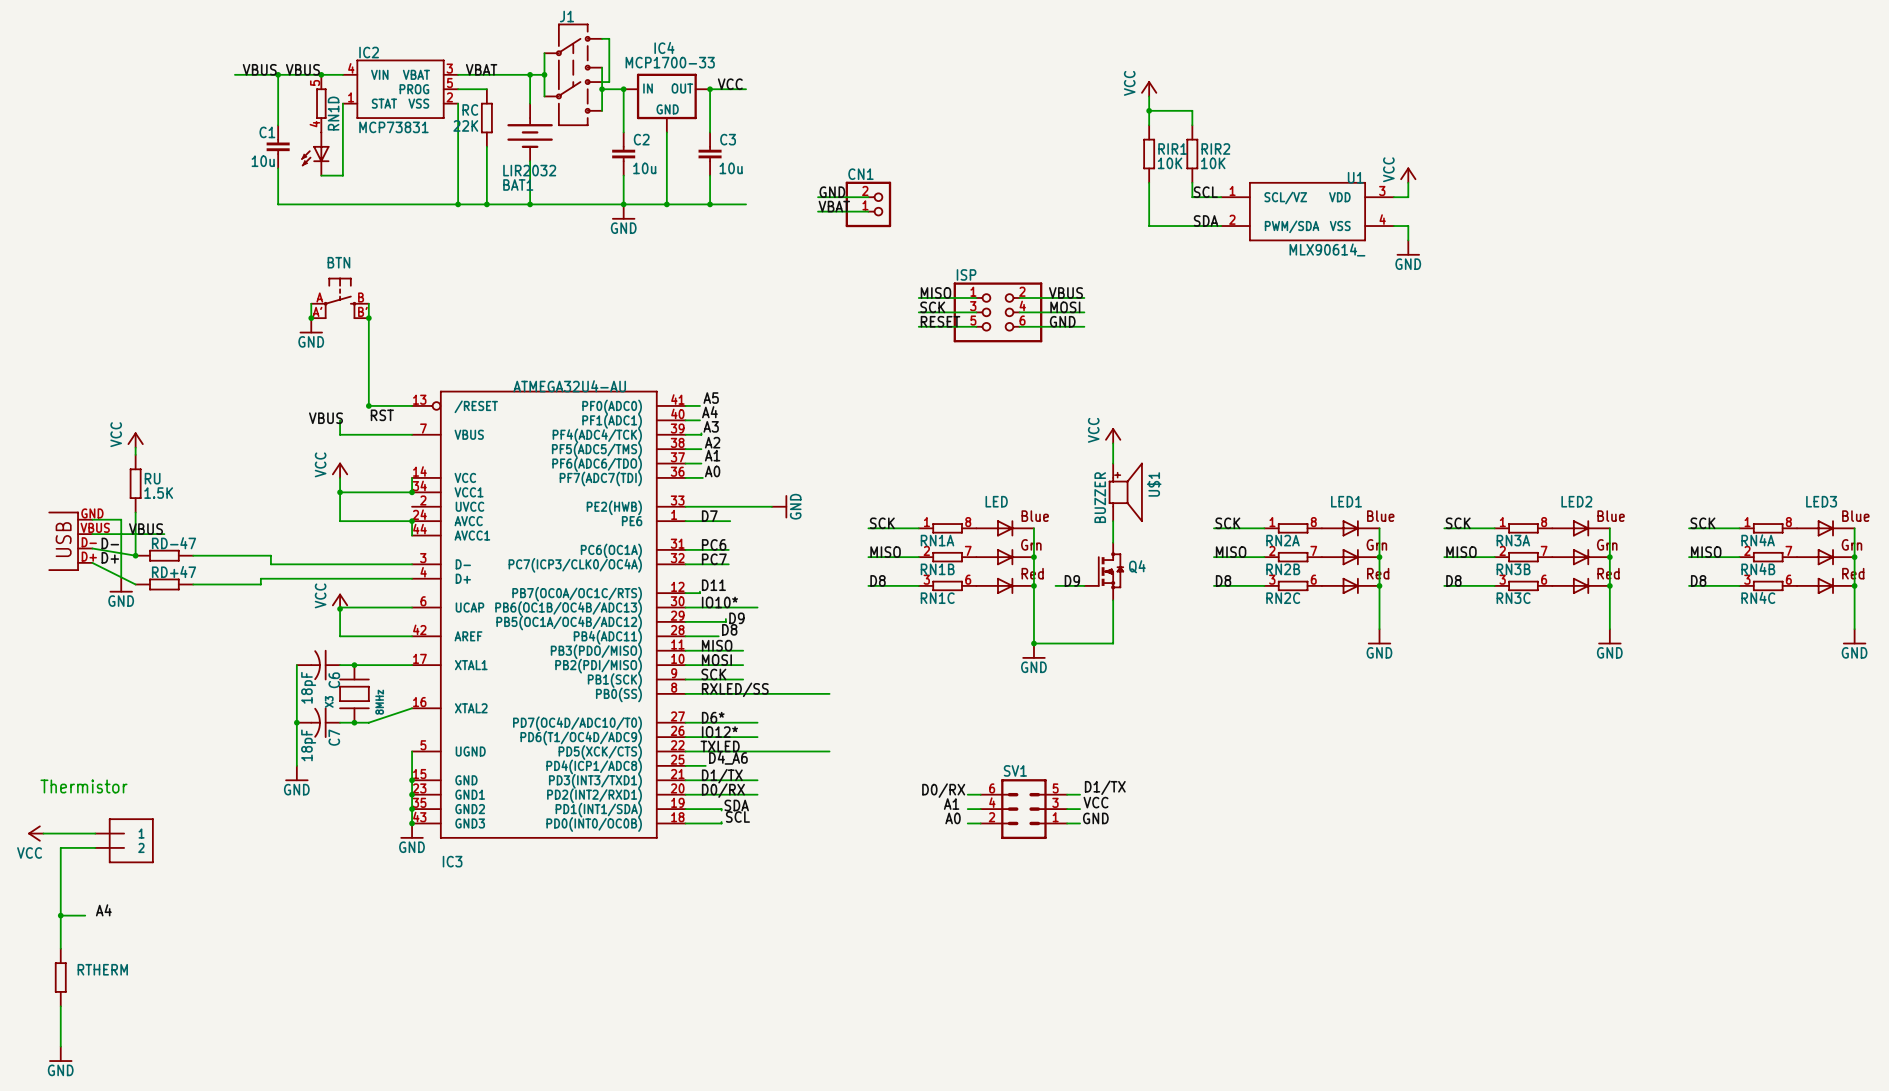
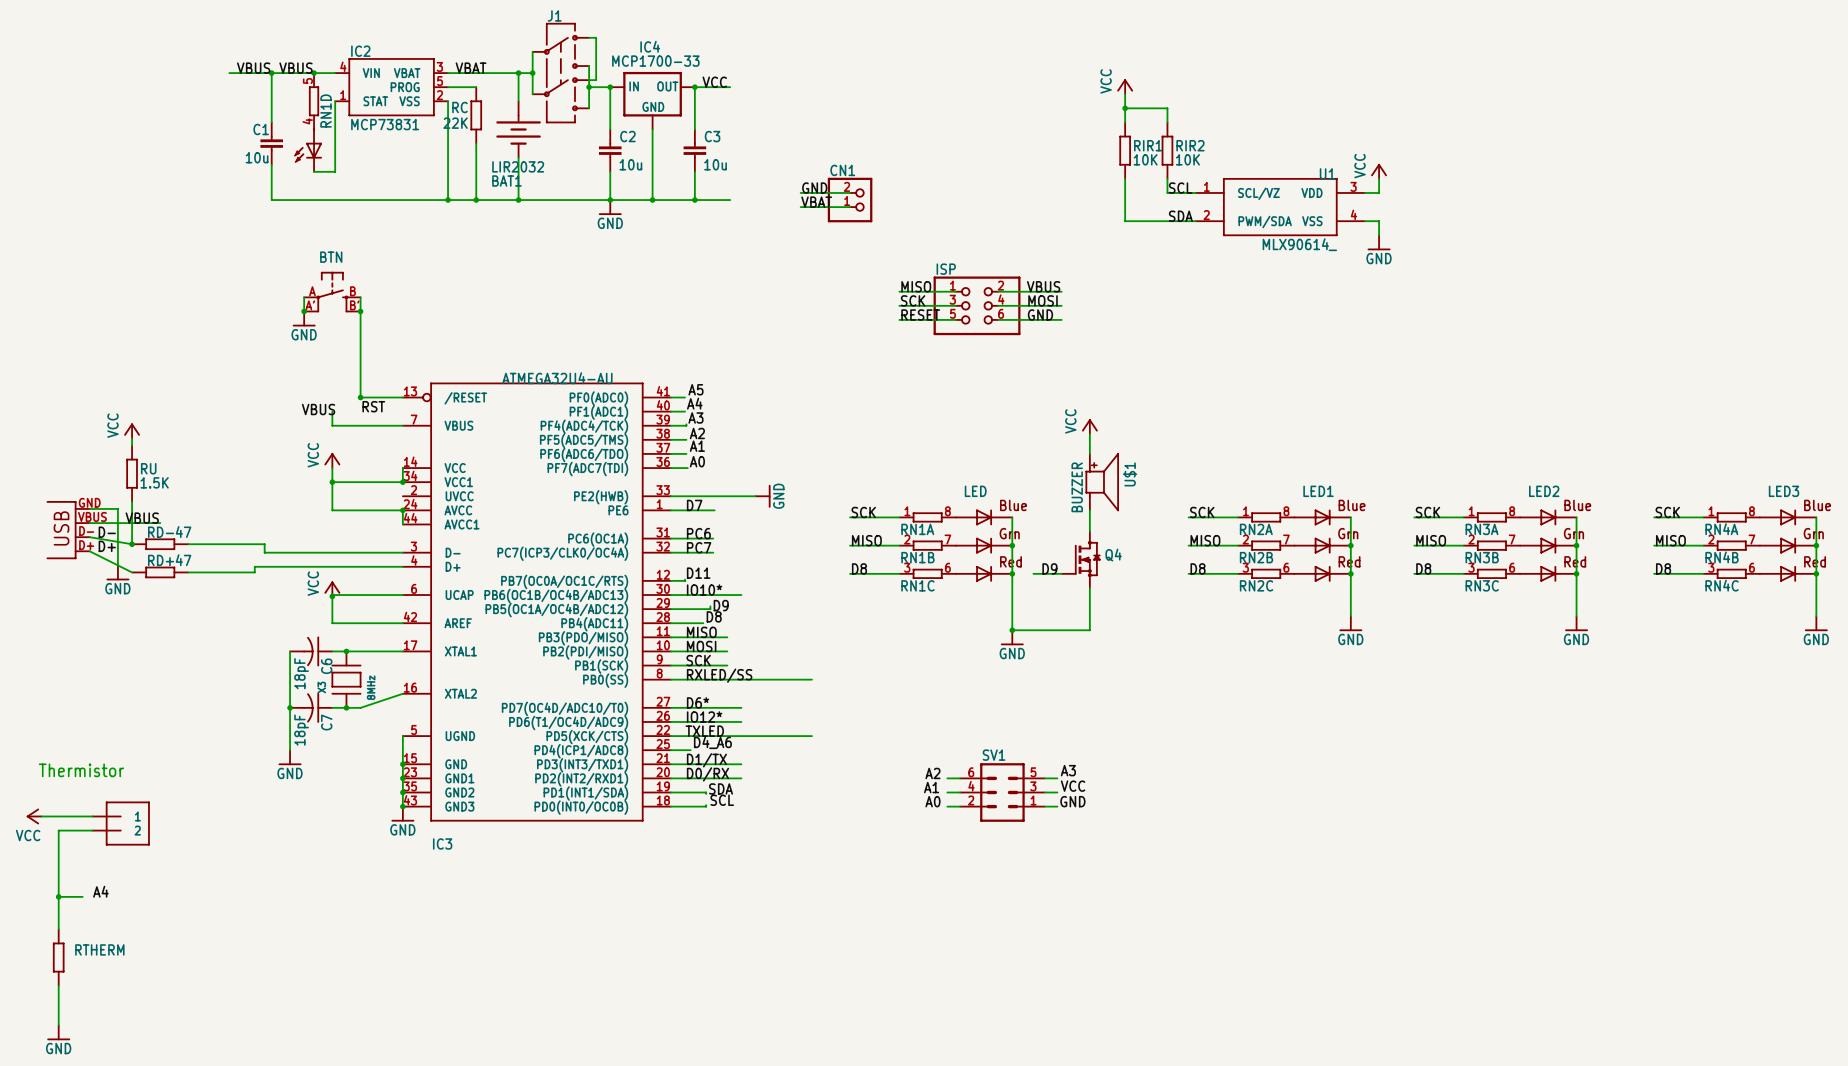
label: D1/TX (1105, 787) -> A3 (1068, 770)
label: none -> A2 (932, 773)
label: D0/RX (943, 790) -> none

